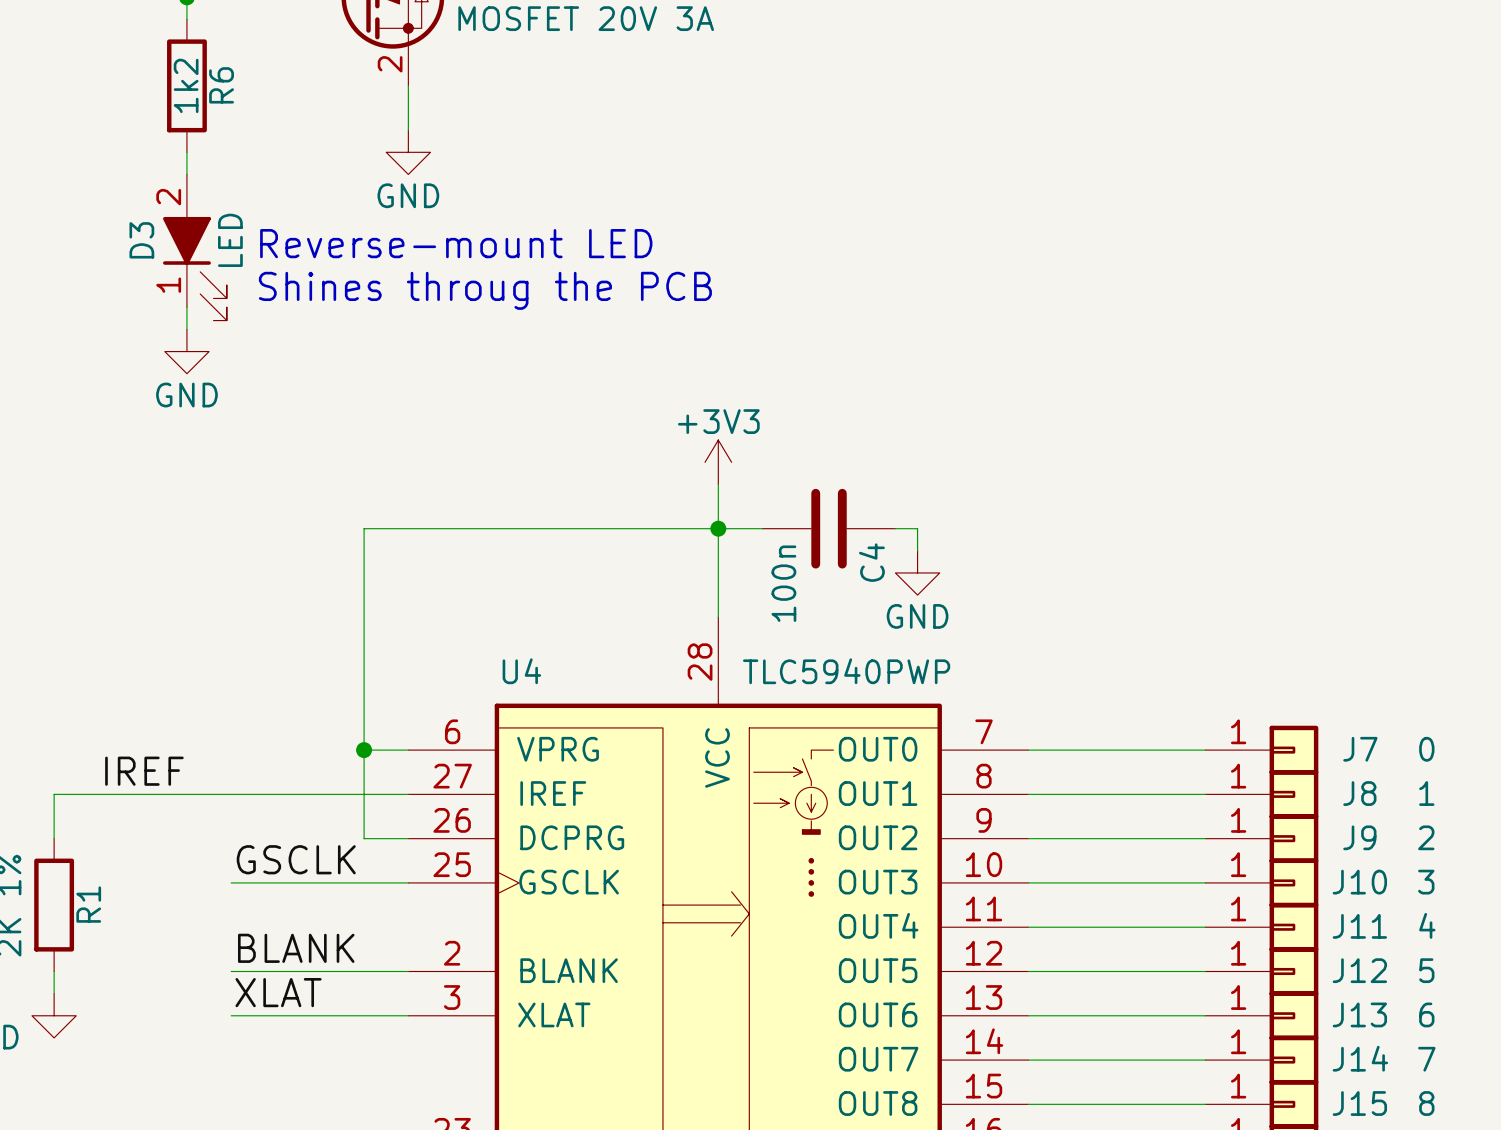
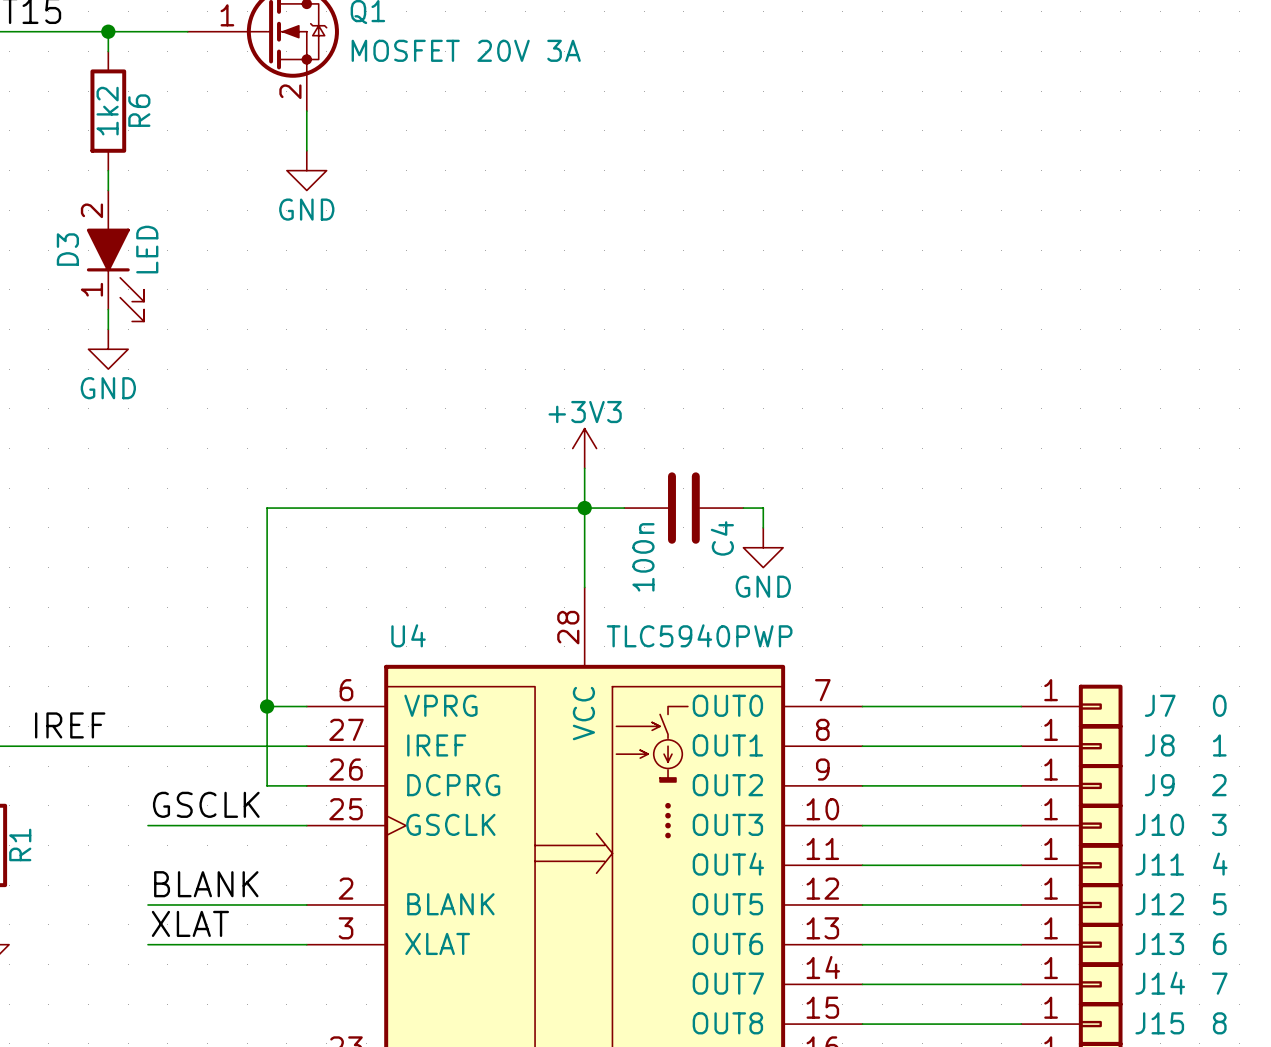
text: Reverse-mount LED (456, 243) -> none
text: Shines throug the PCB (485, 290) -> none

